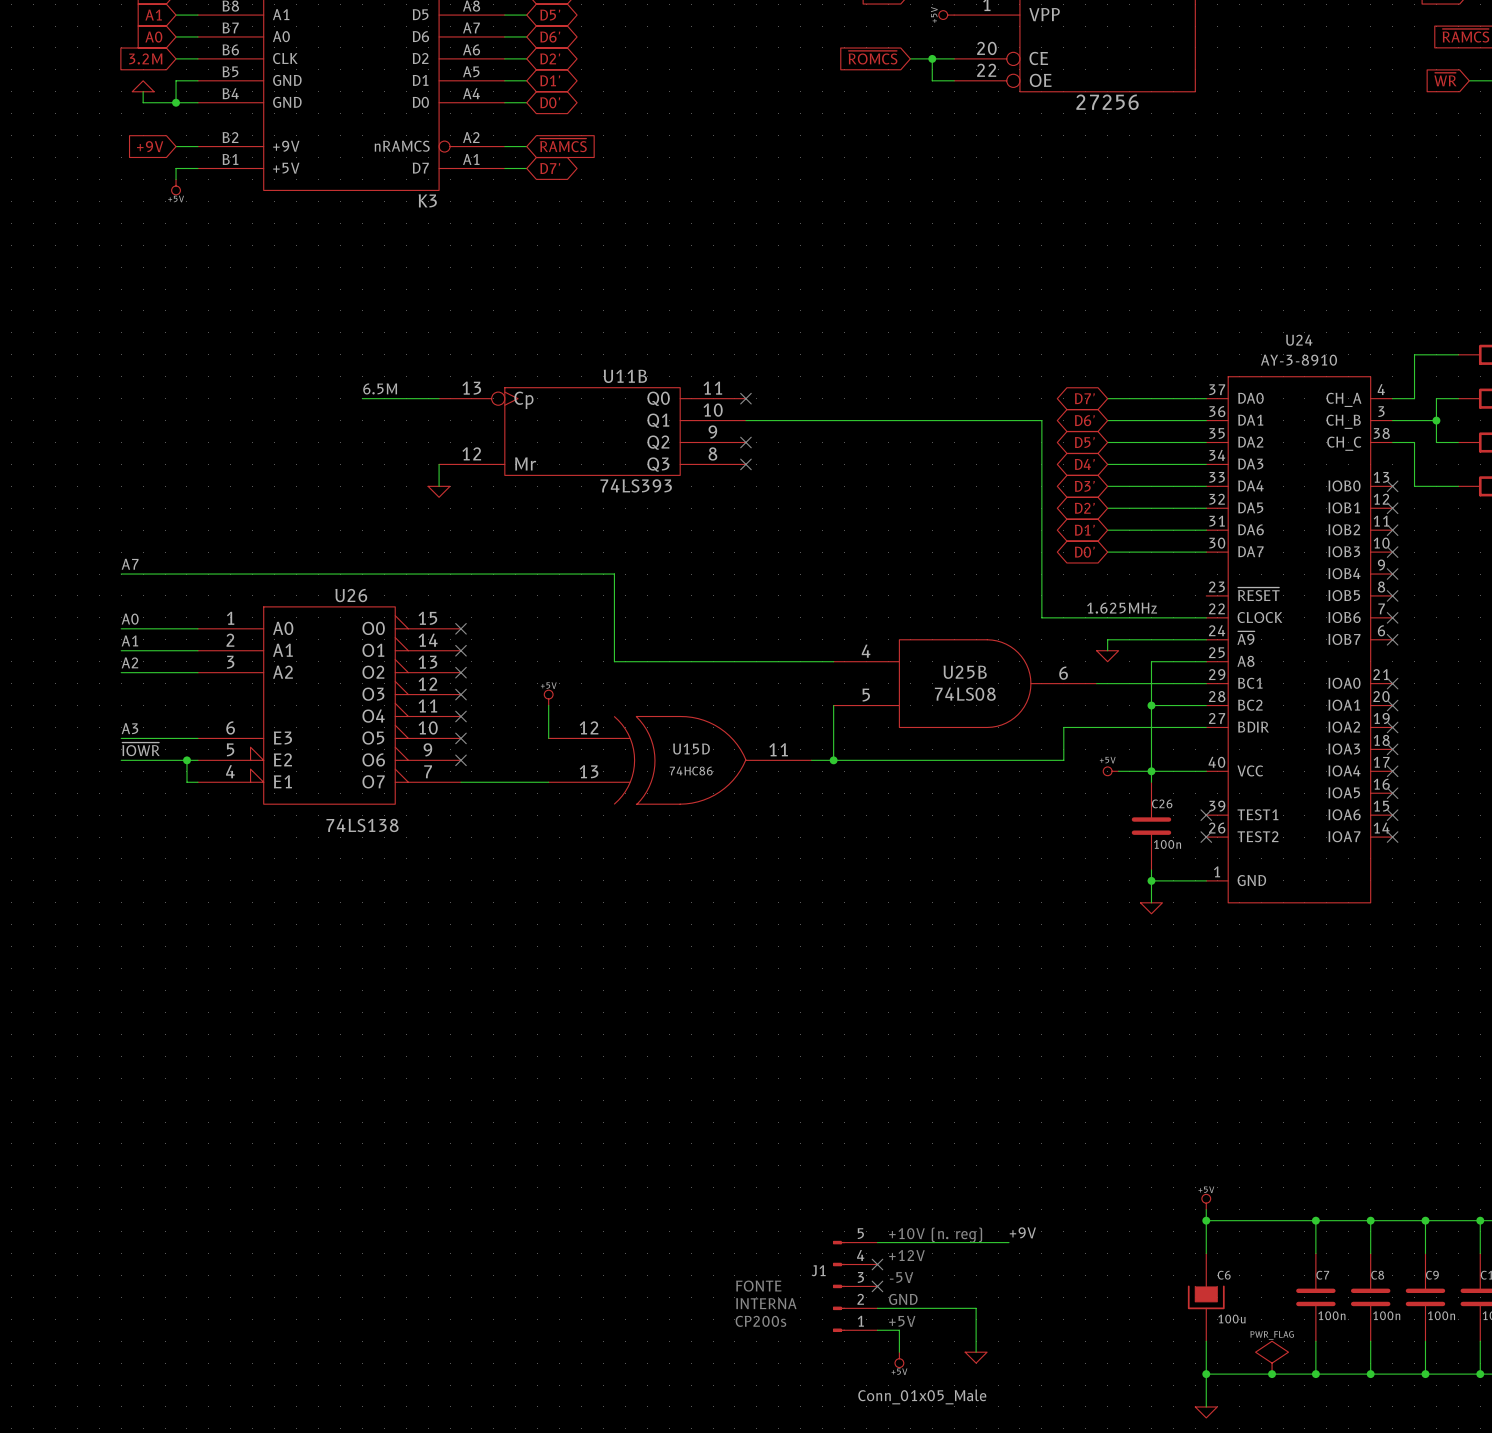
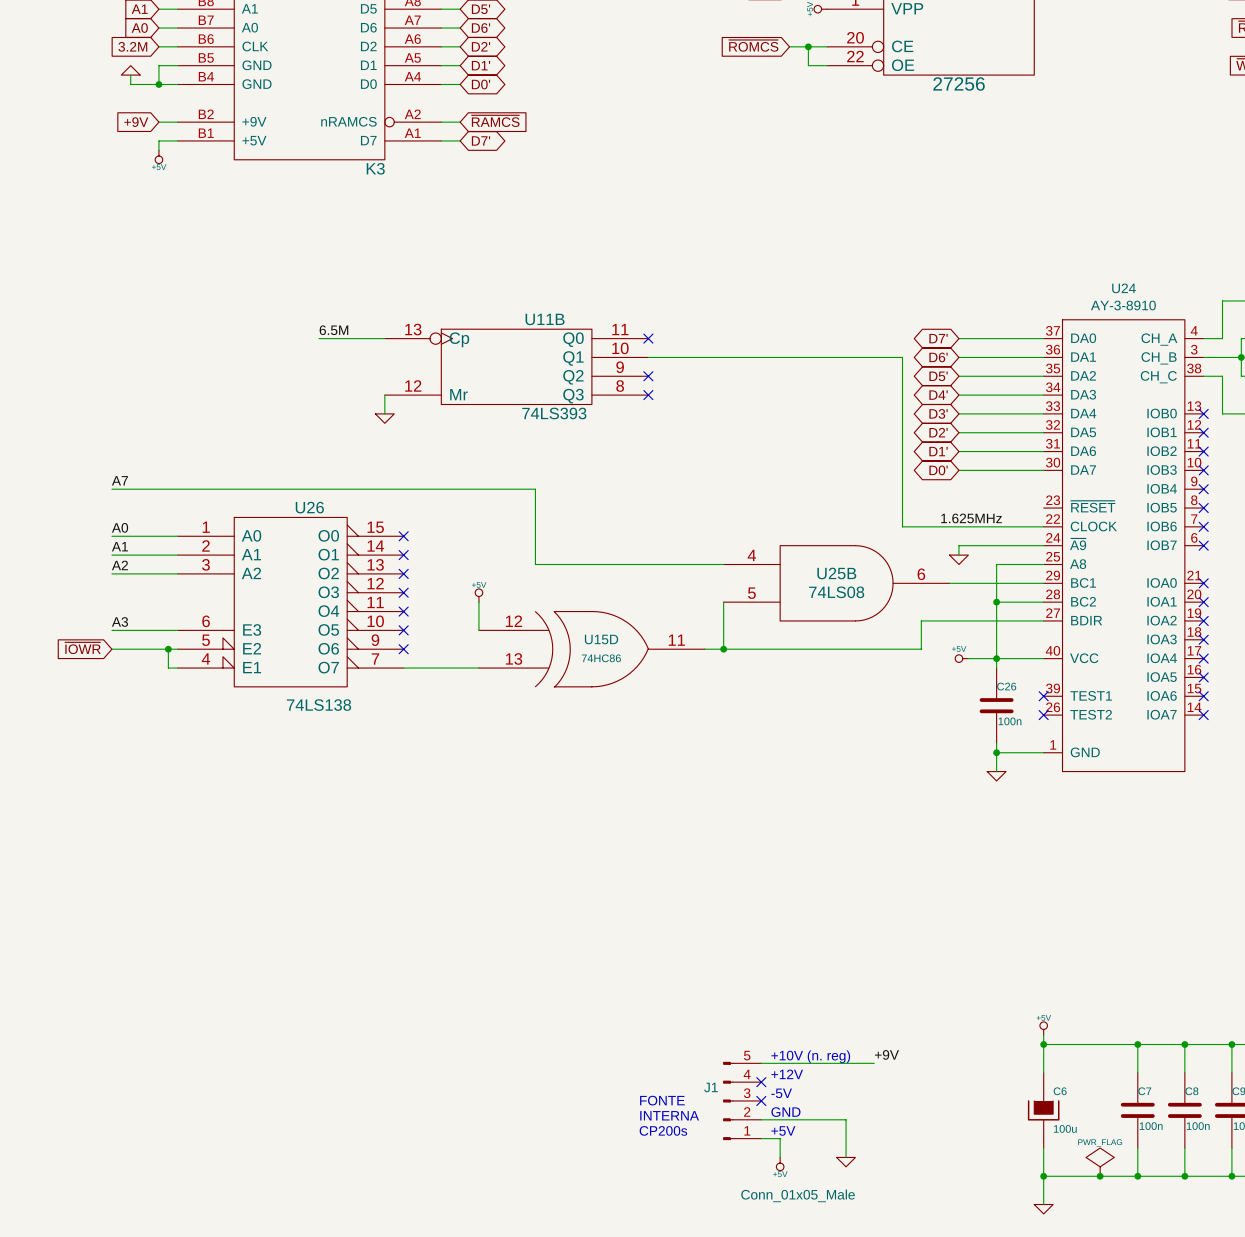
label: ~{IOWR} (141, 749) -> none
global label: none -> ~{IOWR} (82, 648)

